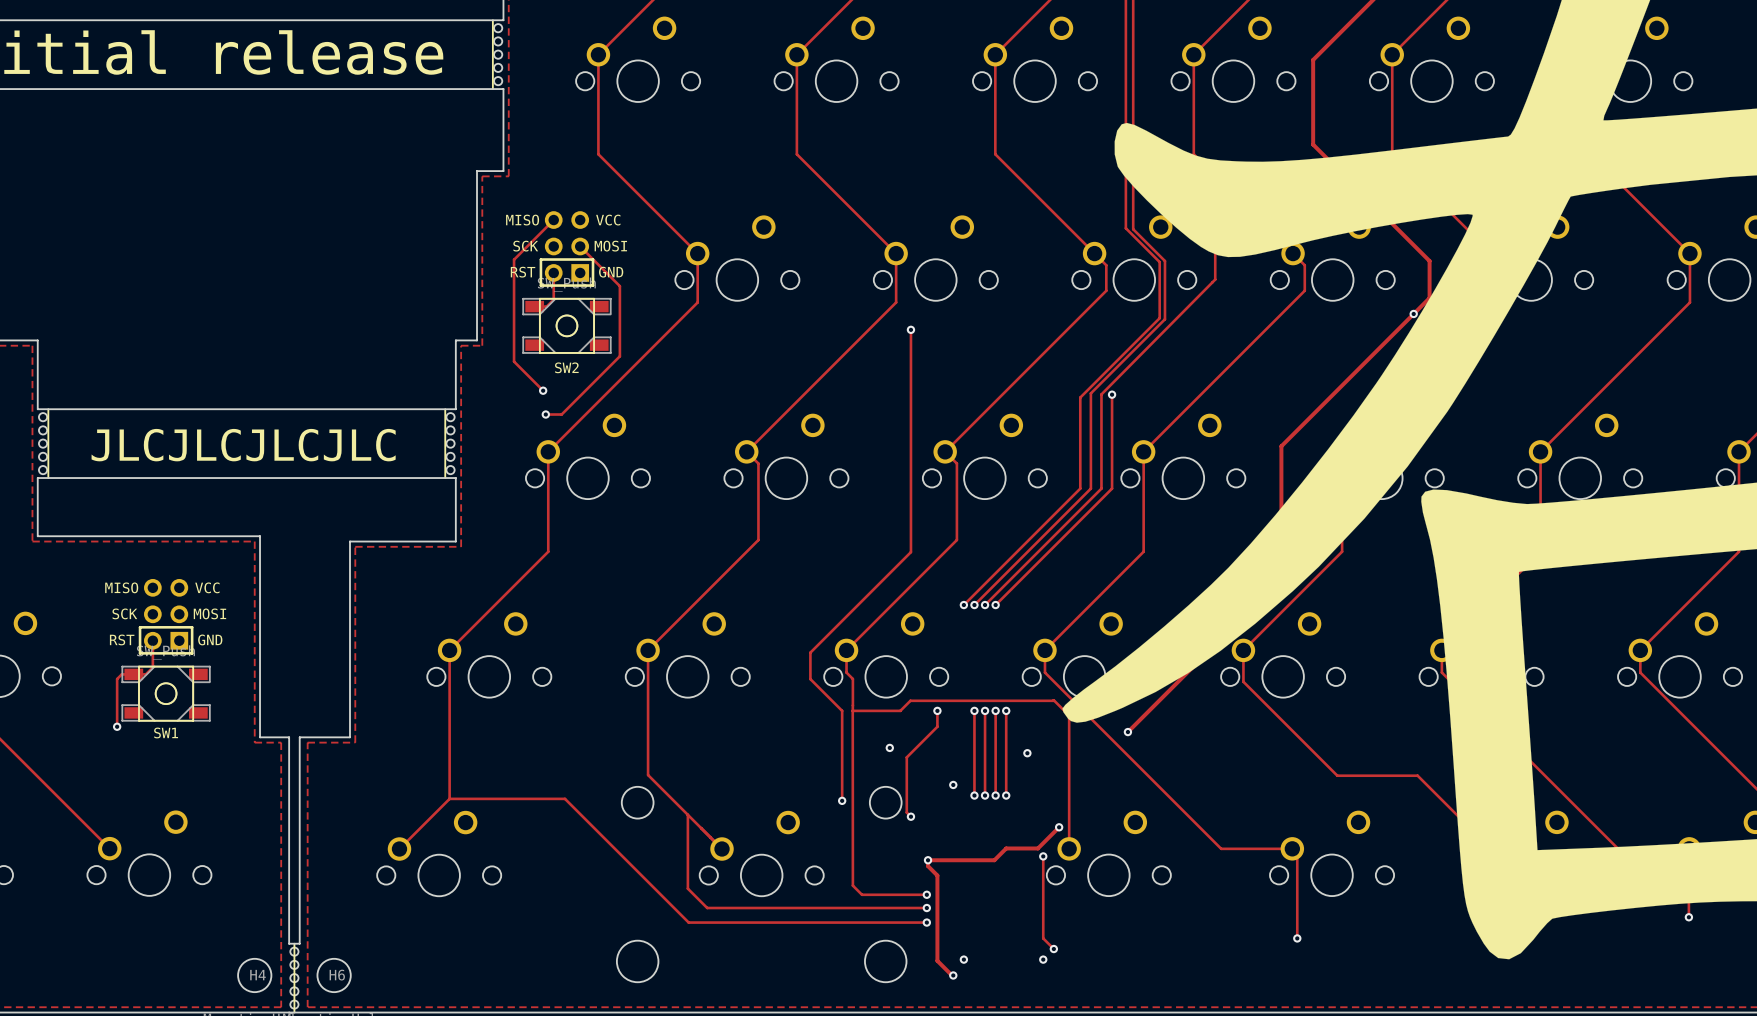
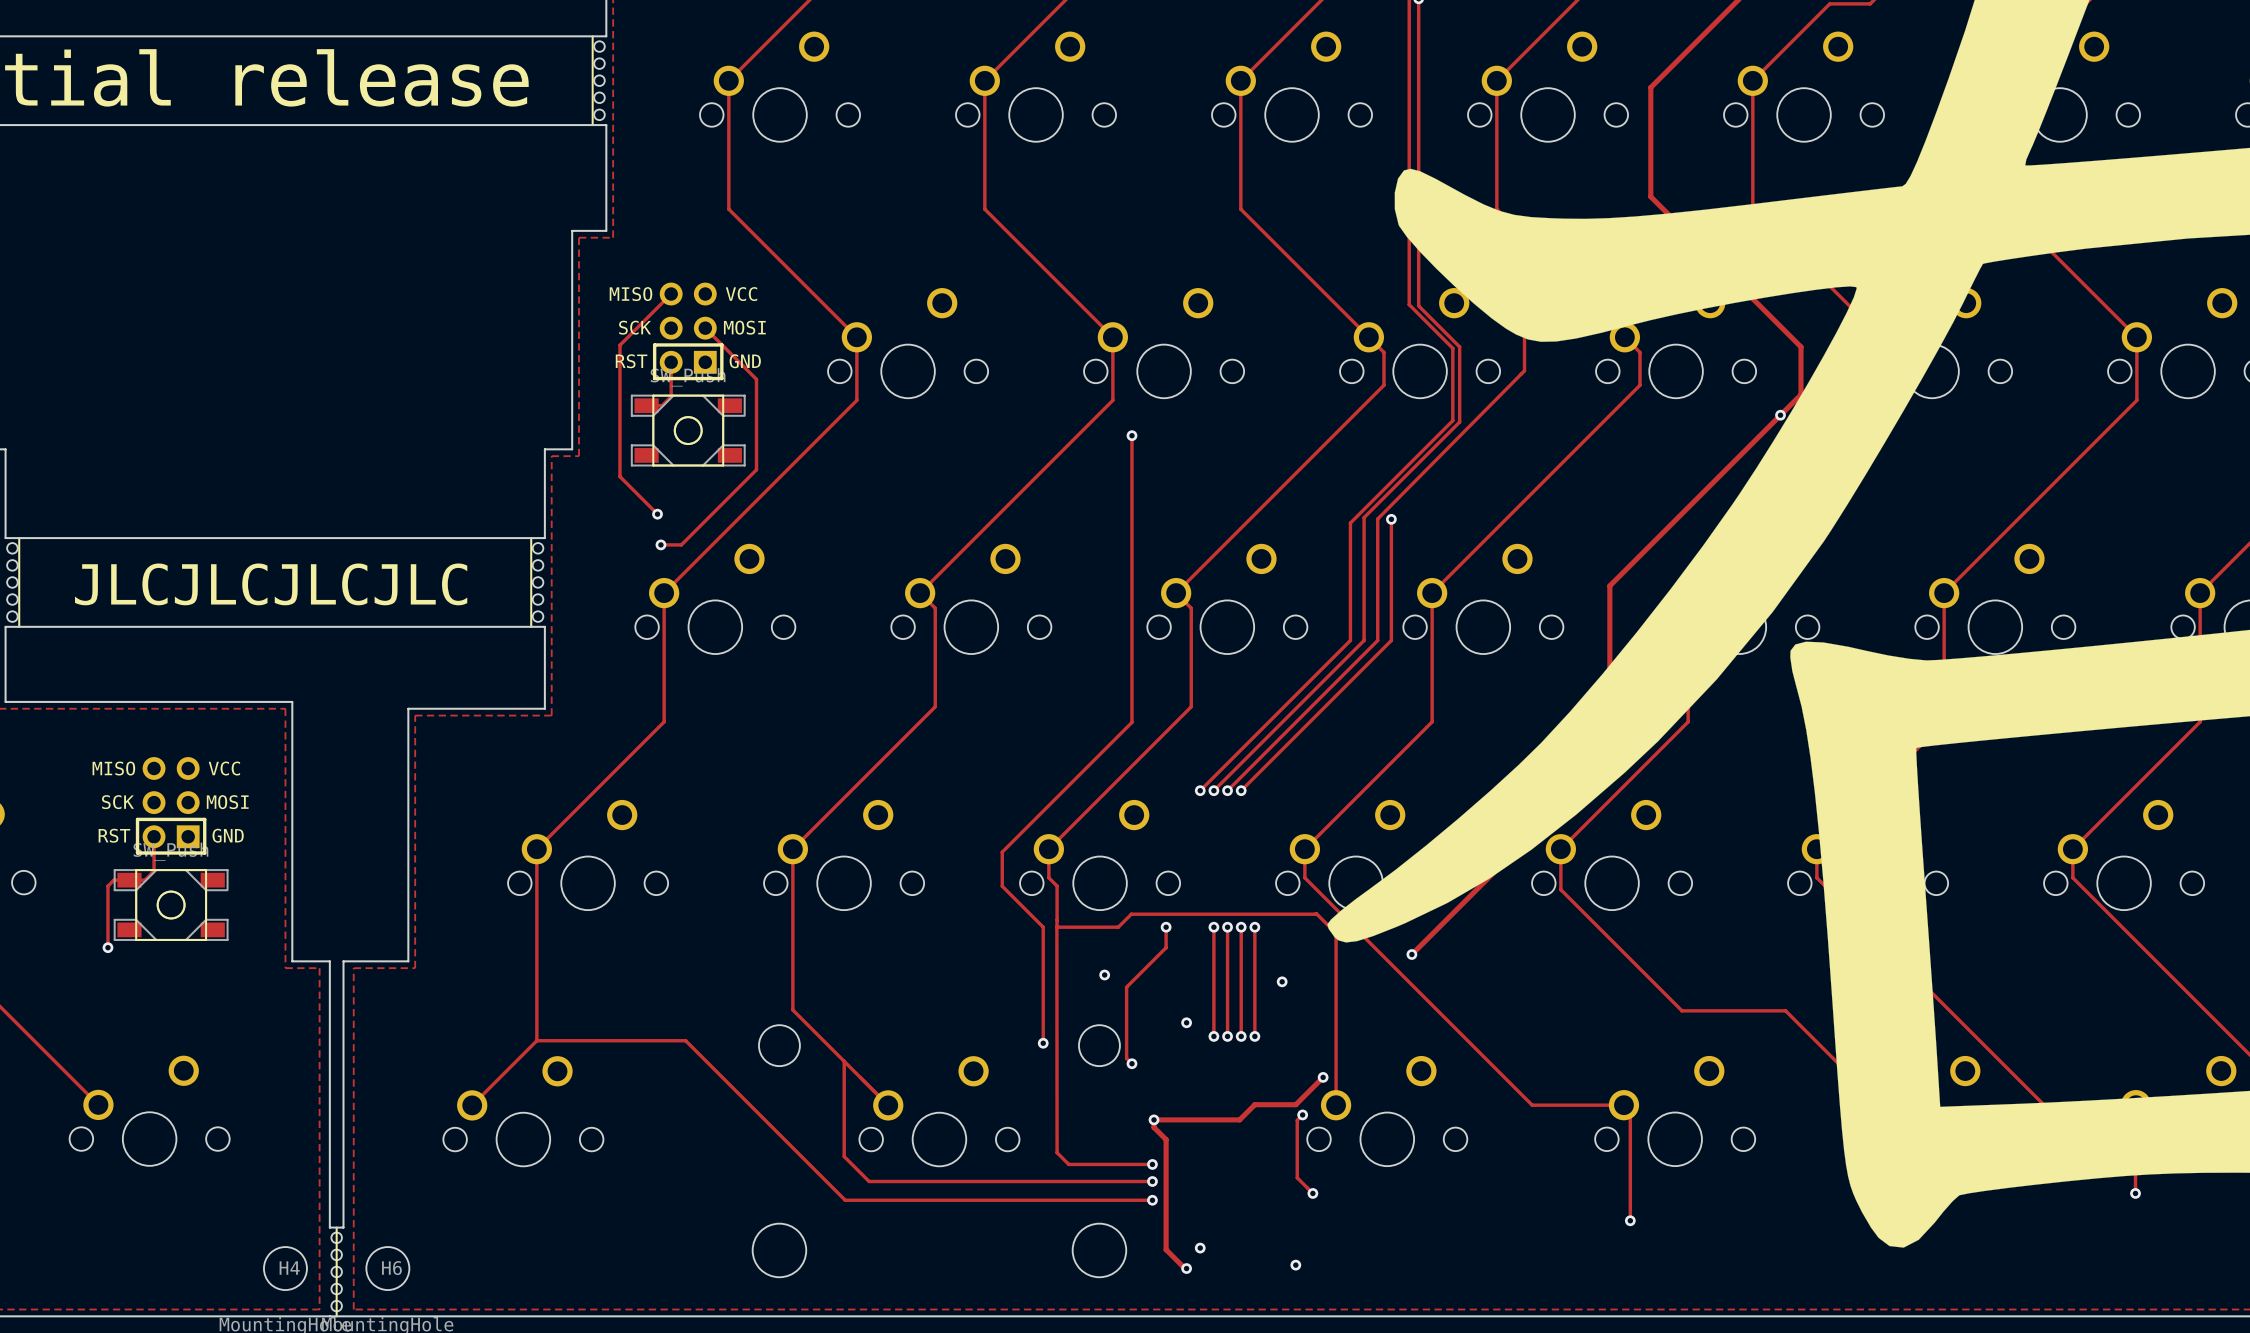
SW2 name: SW2 (566, 367) -> none
SW1 name: SW1 (166, 732) -> none
track: (1043, 856) (1043, 938) (1053, 949) -> (1302, 1114) (1297, 1120) (1297, 1177) (1312, 1193)
via: none -> (1312, 1193)
via: (1053, 949) -> none
via: (1043, 959) -> none
via: none -> (1295, 1265)

